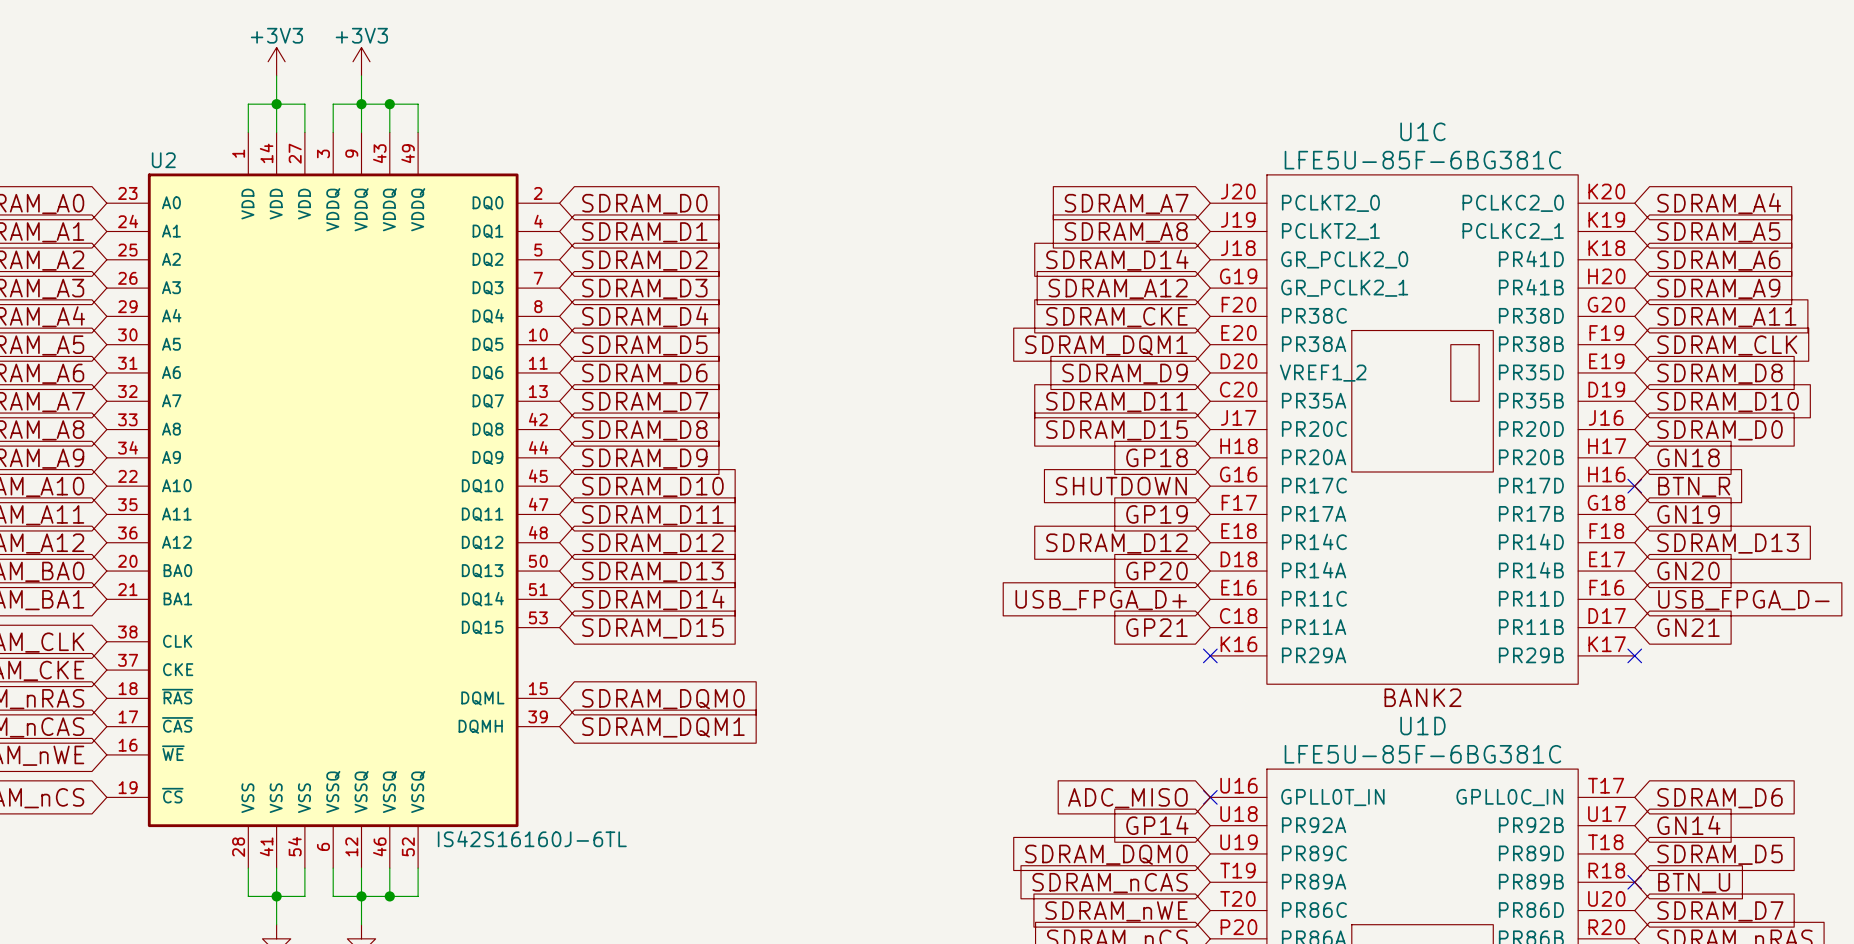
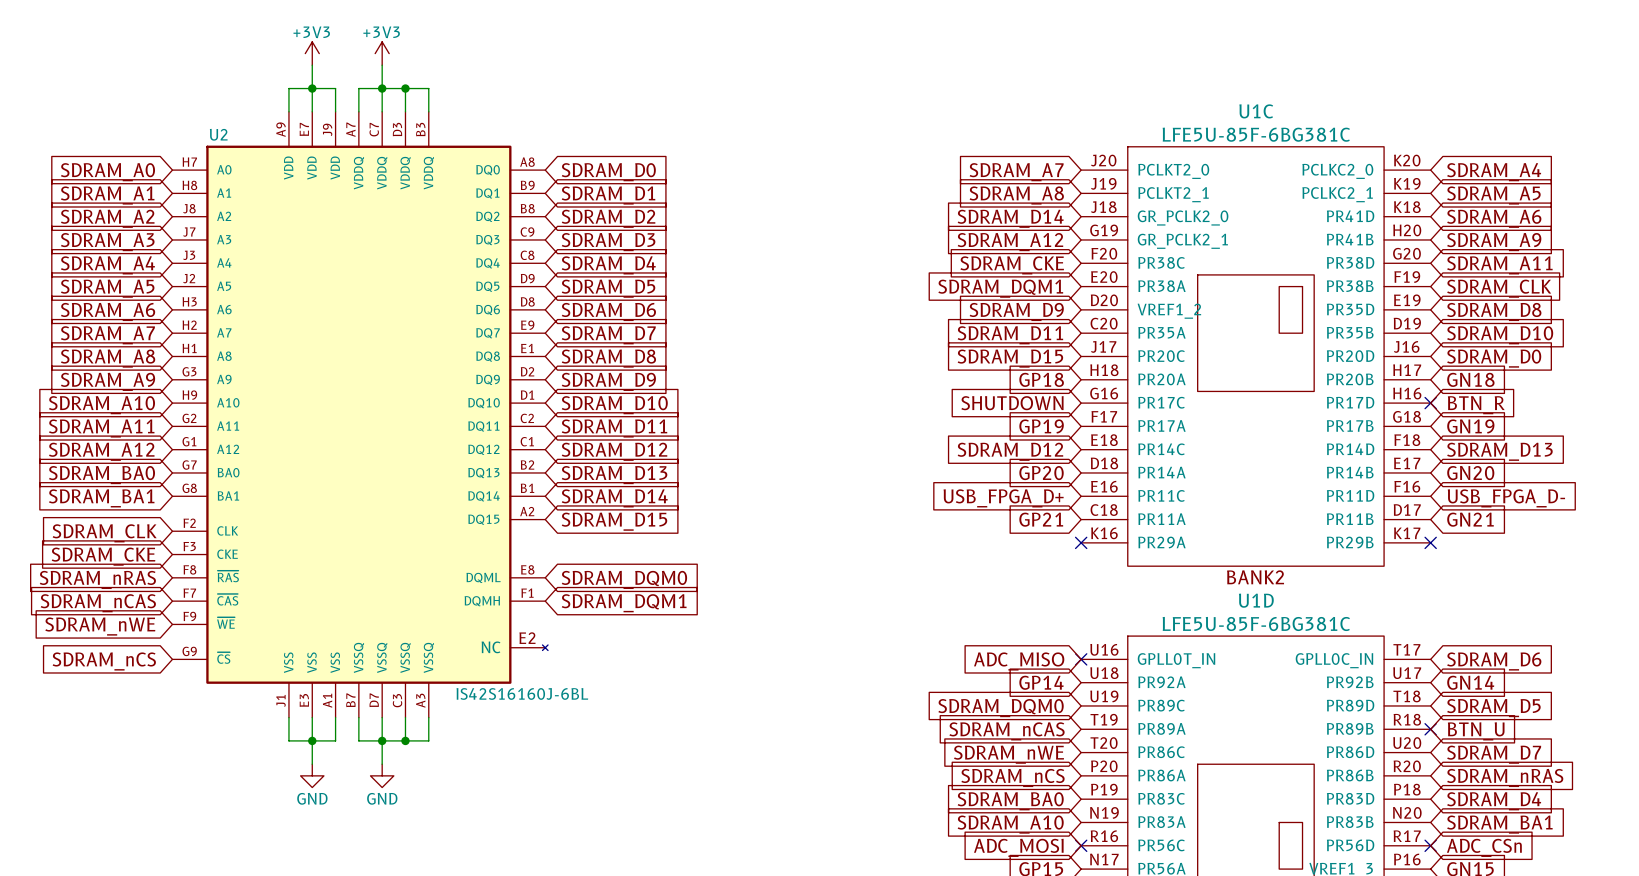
U2 symbol: [106, 132, 560, 869] -> [172, 111, 549, 718]
U2 value: IS42S16160J-6TL (532, 838) -> IS42S16160J-6BL (522, 693)

